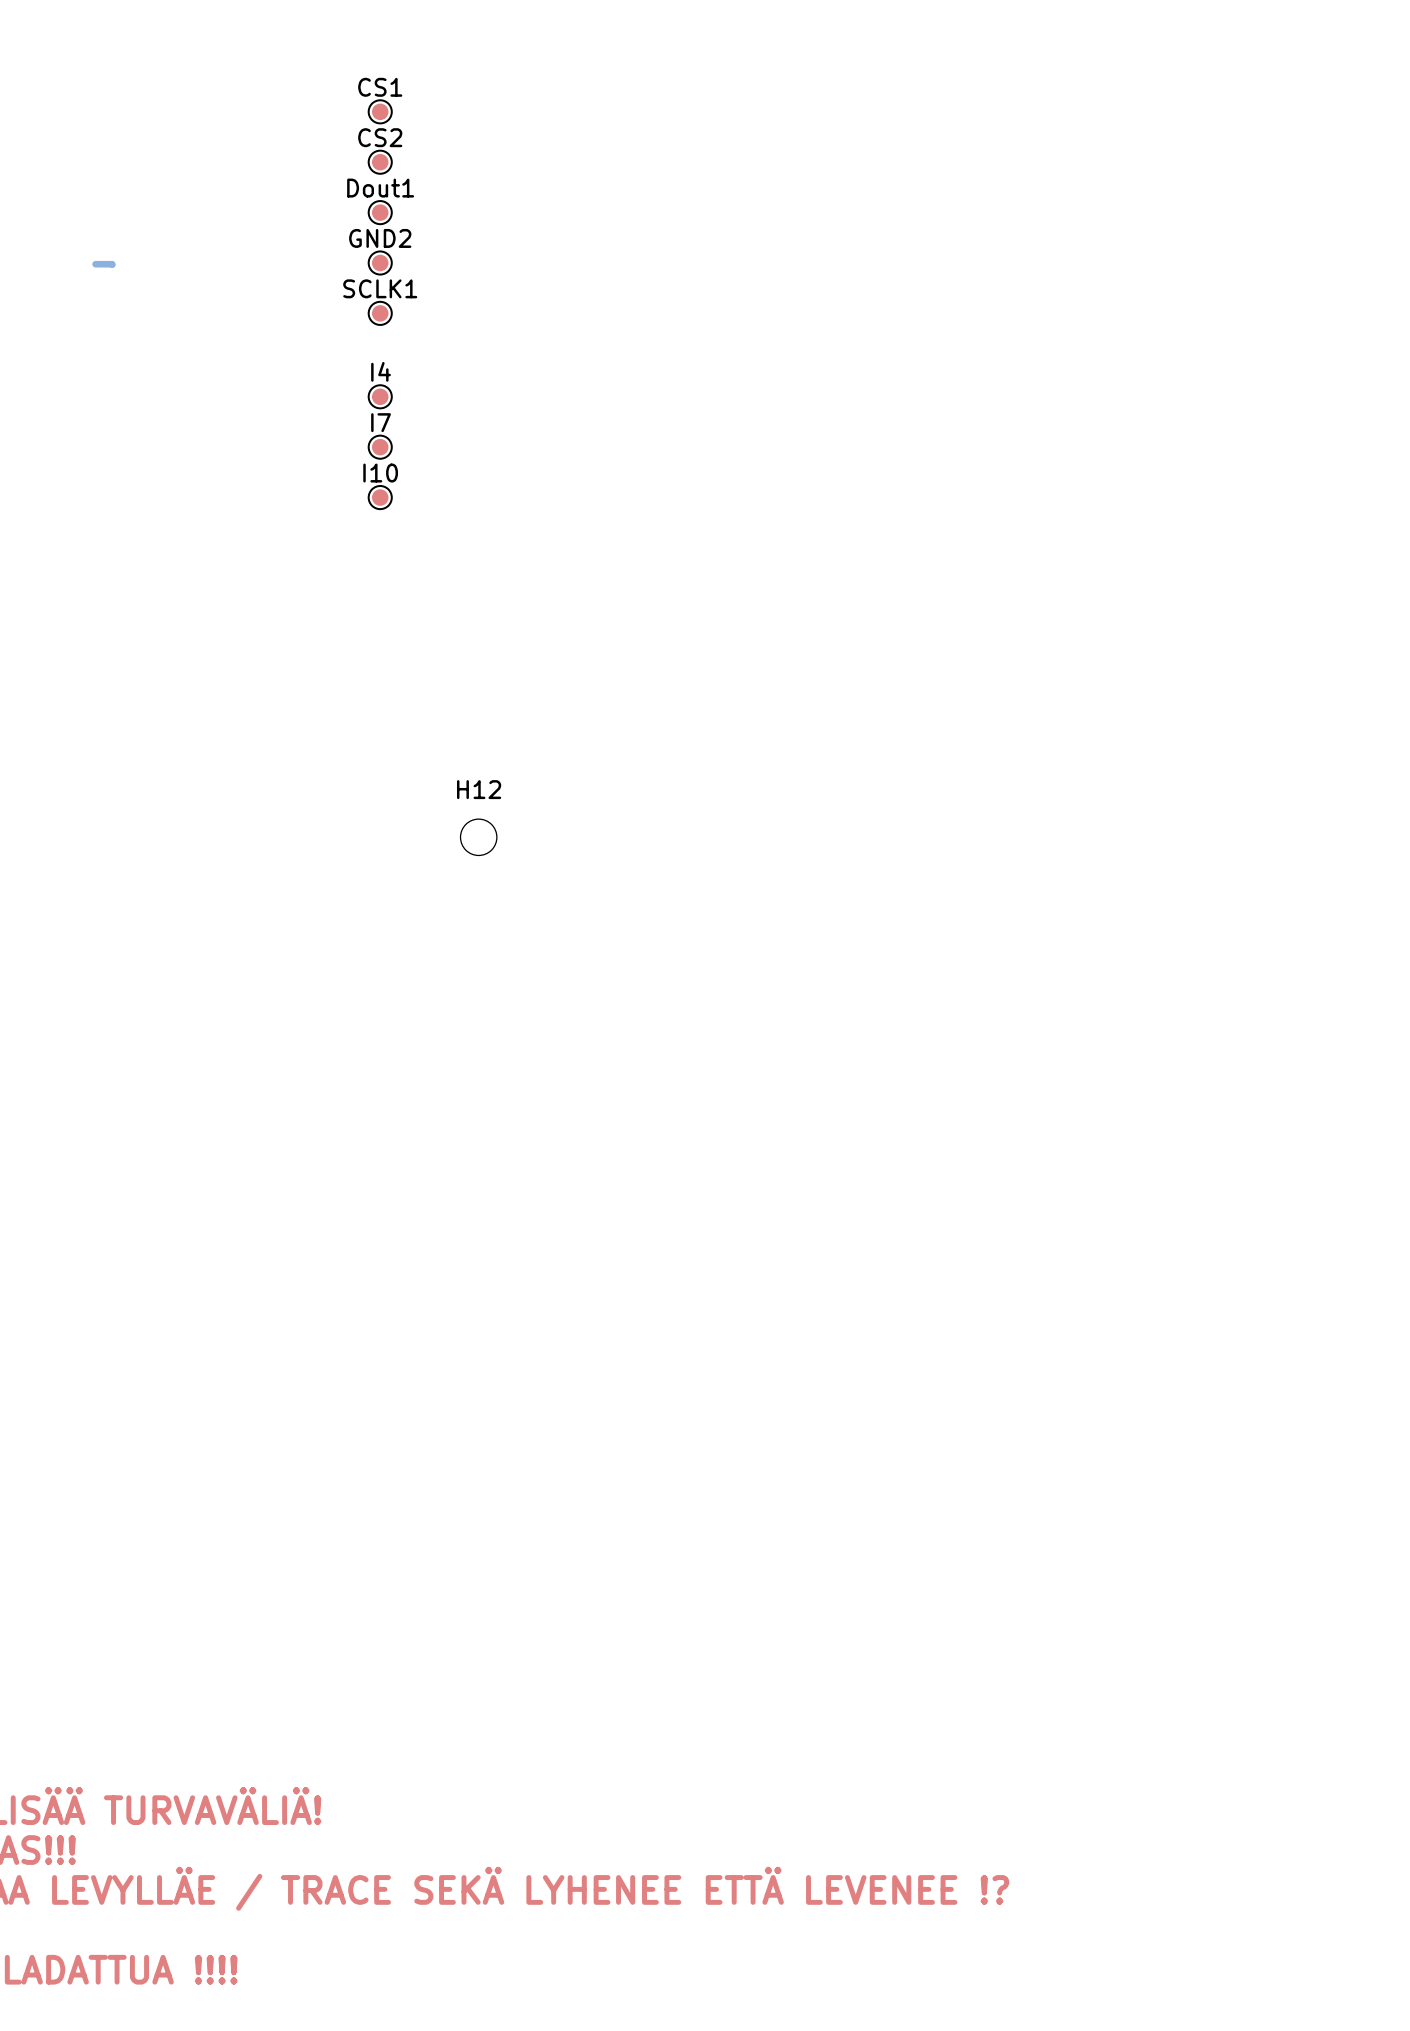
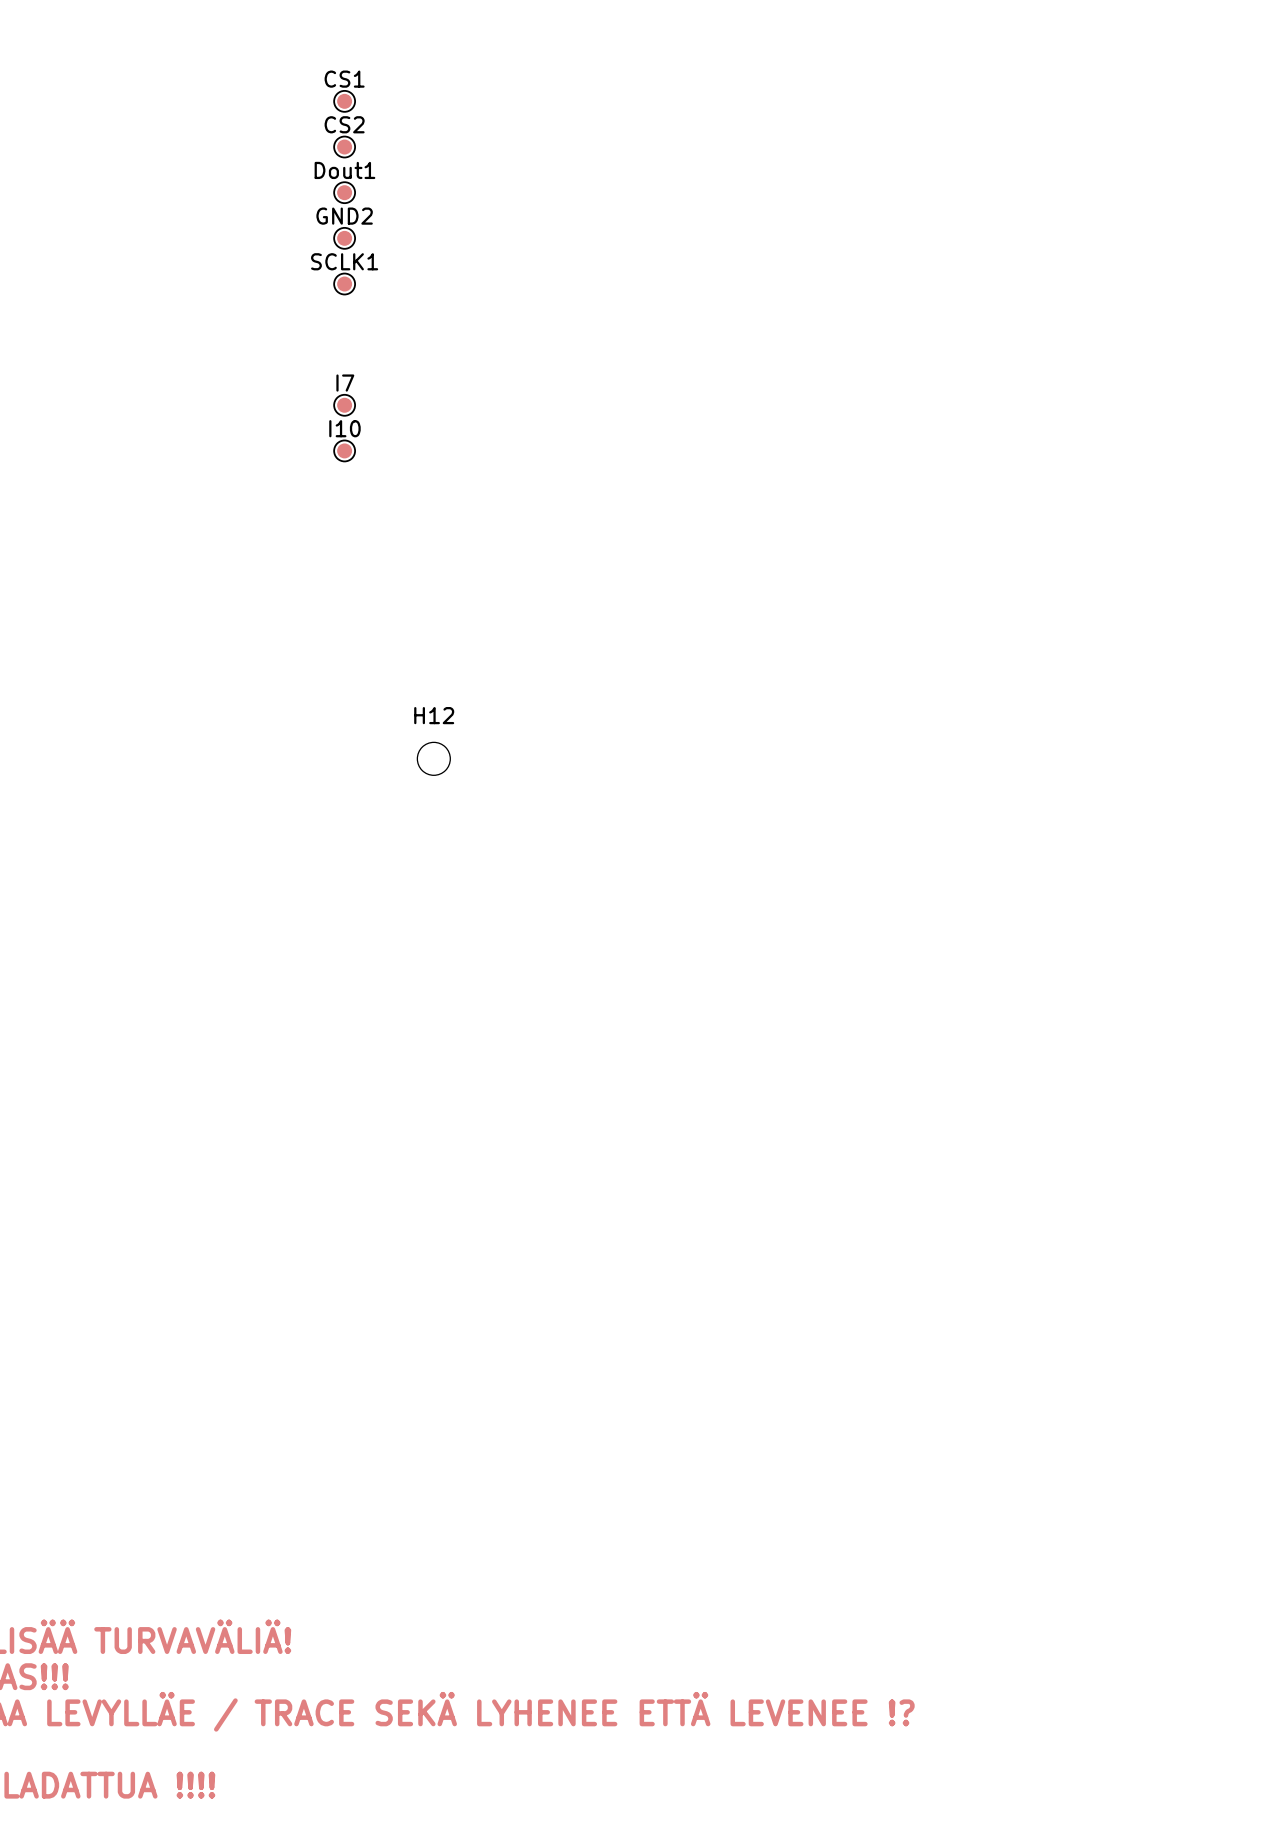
bottom track: (95, 264) (112, 264) -> none
I4: (380, 396) -> none

